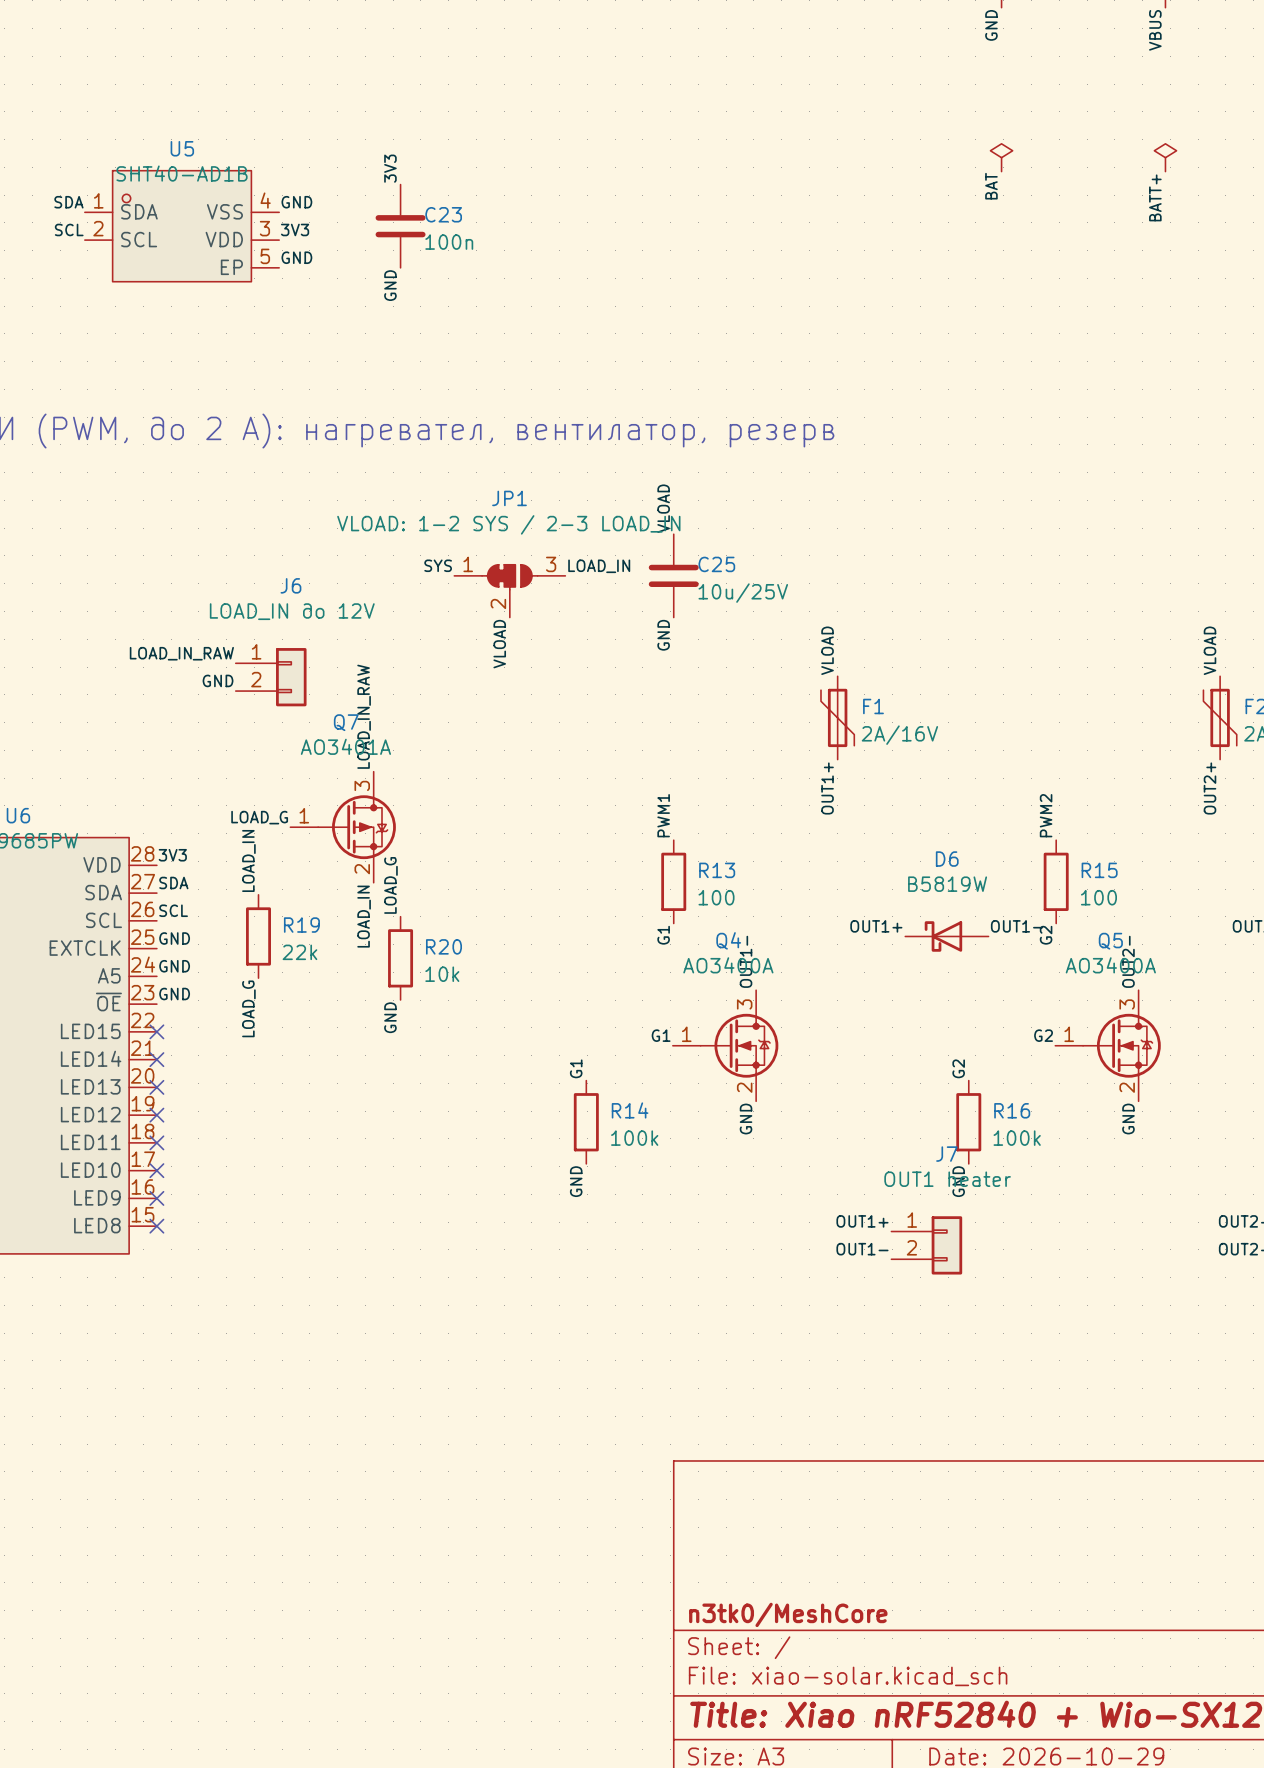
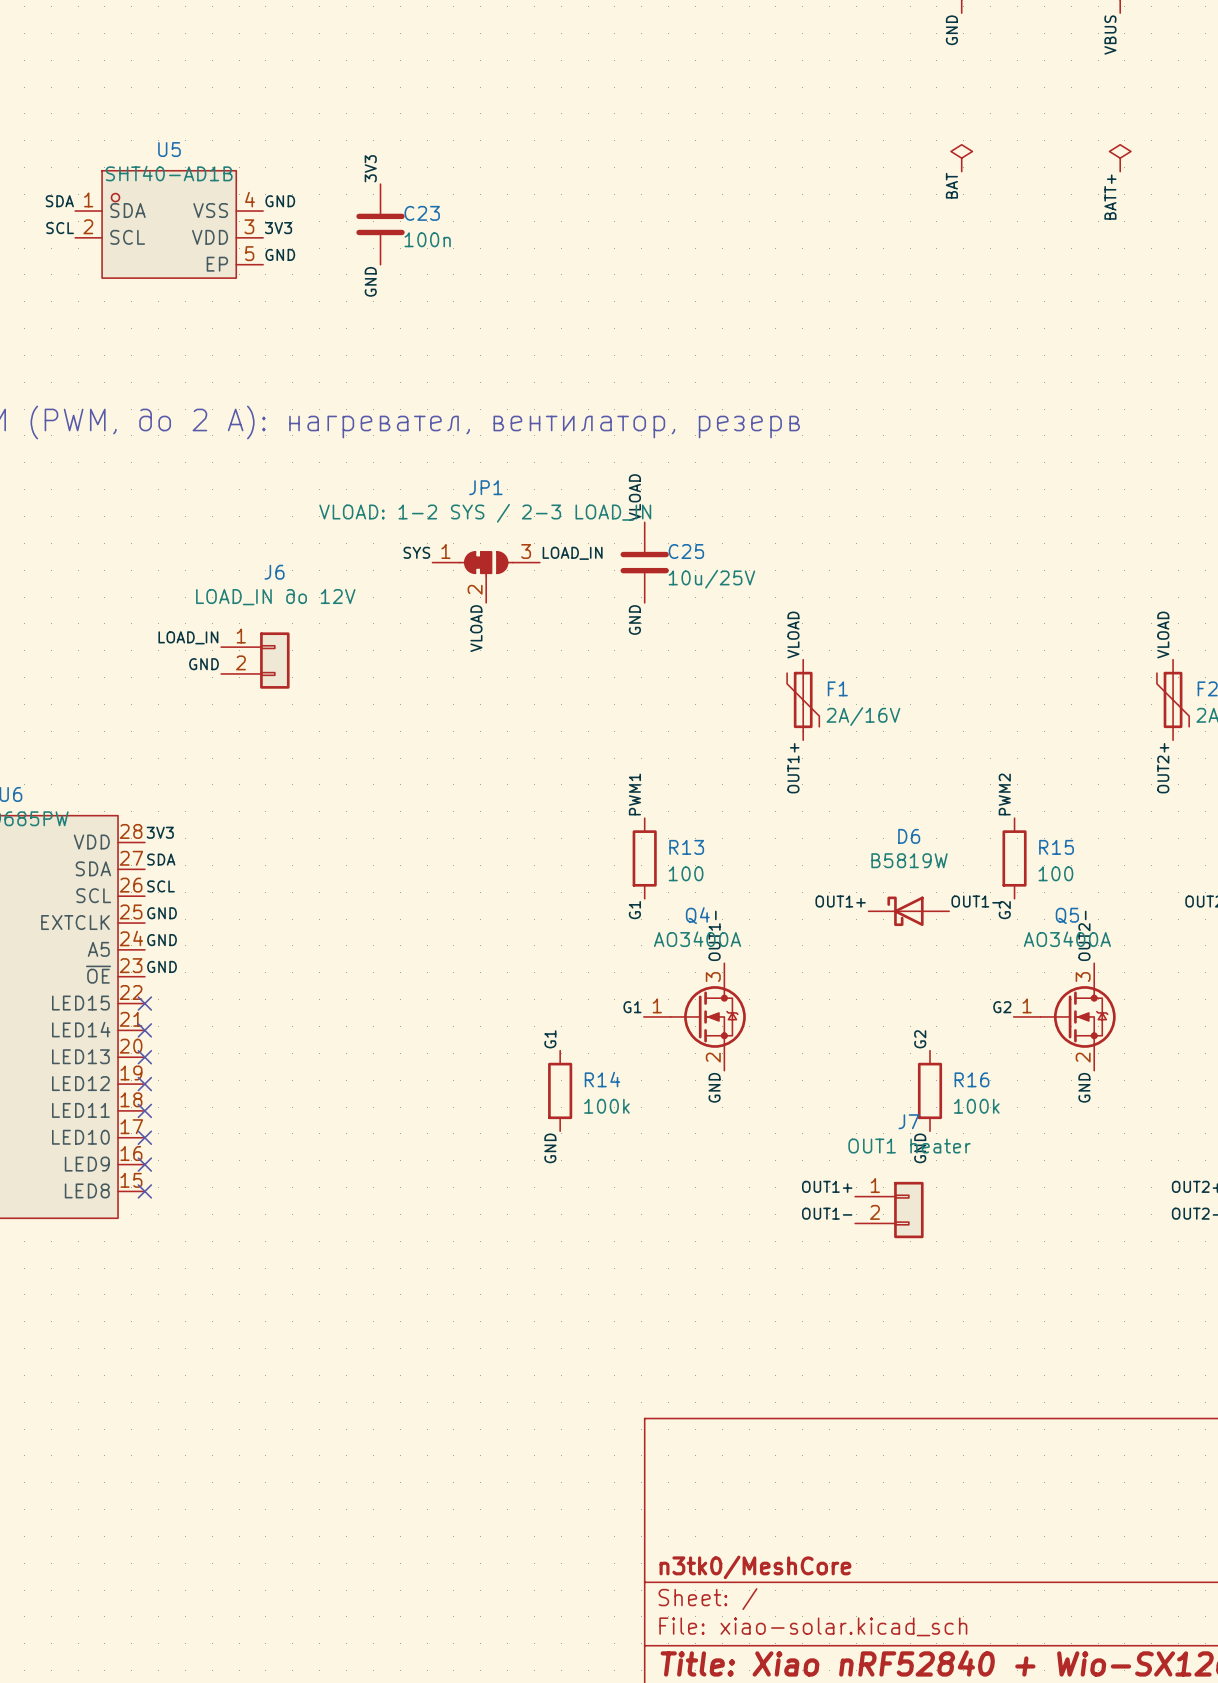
label: LOAD_IN_RAW (181, 653) -> LOAD_IN (188, 637)
label: LOAD_IN_RAW (364, 716) -> none
label: LOAD_G (259, 817) -> none
Q7: AO3401A (343, 827) -> none
label: LOAD_IN (248, 860) -> none
label: LOAD_G (390, 885) -> none
label: LOAD_IN (364, 916) -> none
R19: 22k (258, 936) -> none
R20: 10k (400, 958) -> none
label: LOAD_G (248, 1008) -> none
label: GND (390, 1017) -> none

